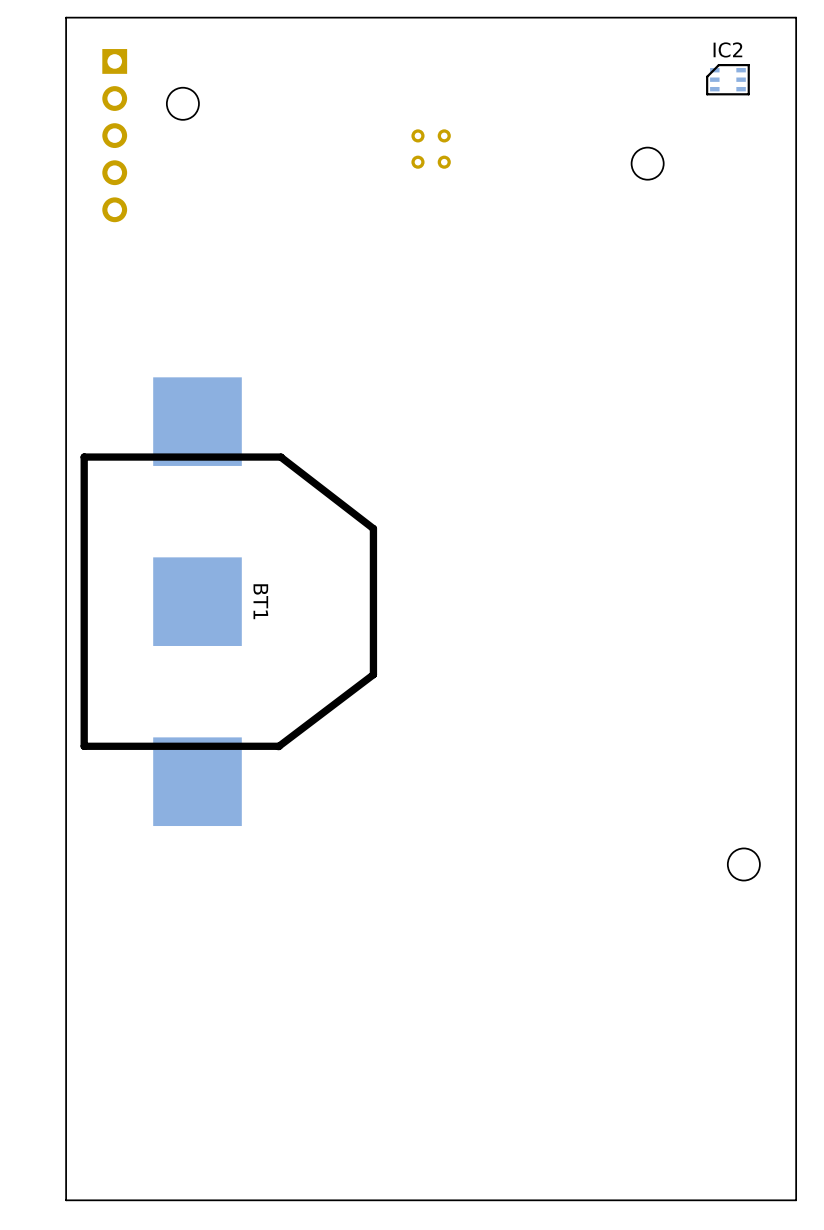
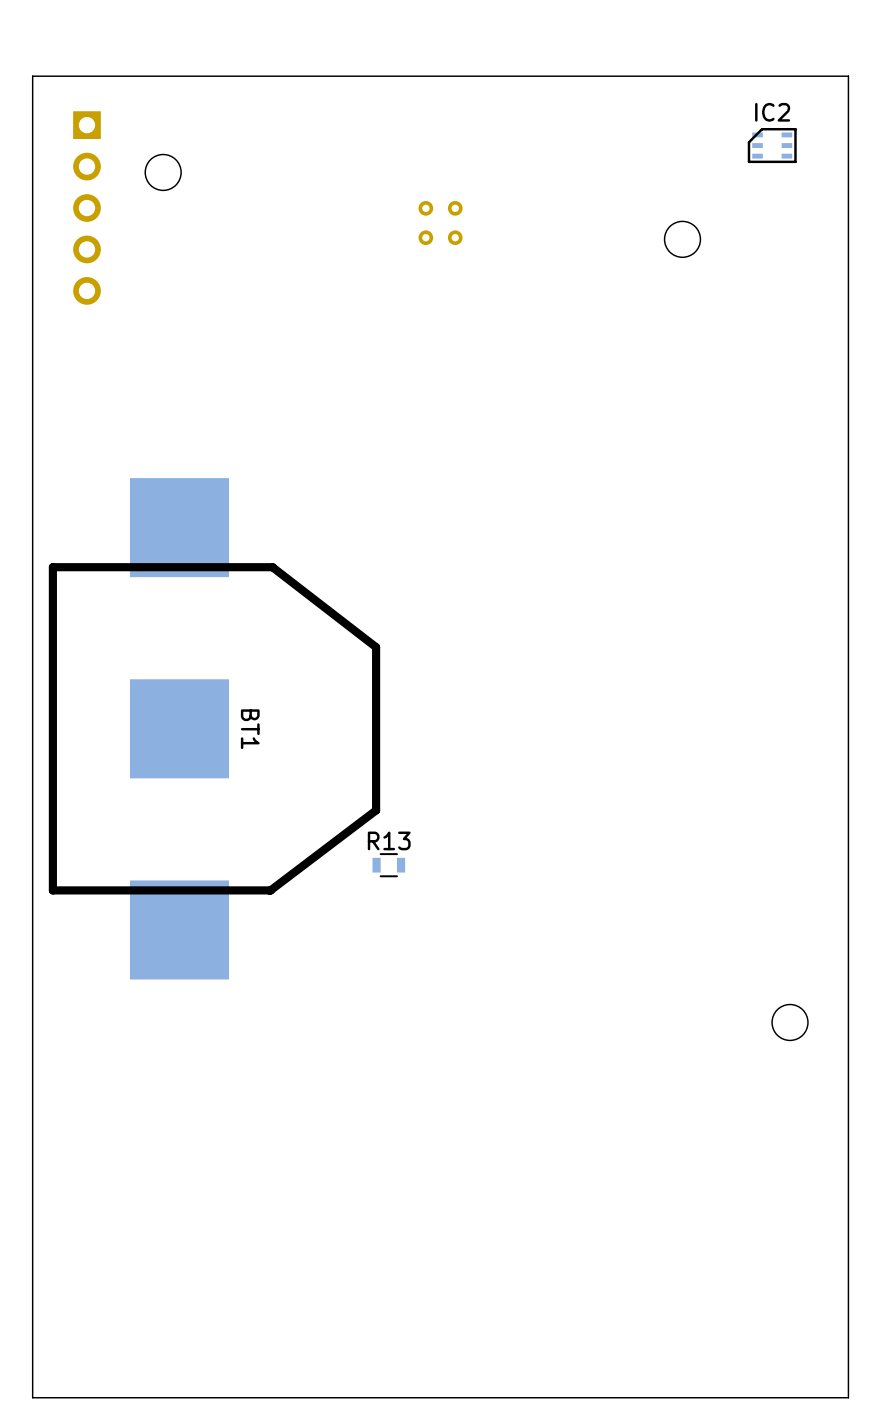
R13: none -> (388, 865)

